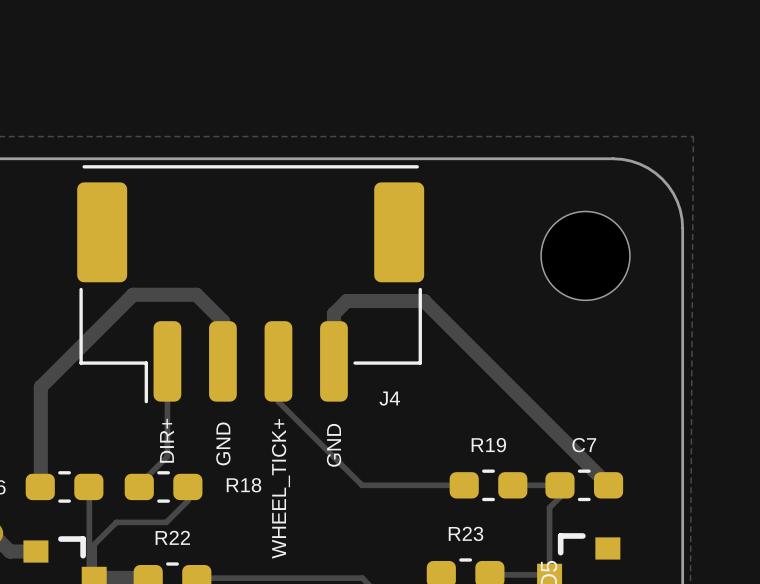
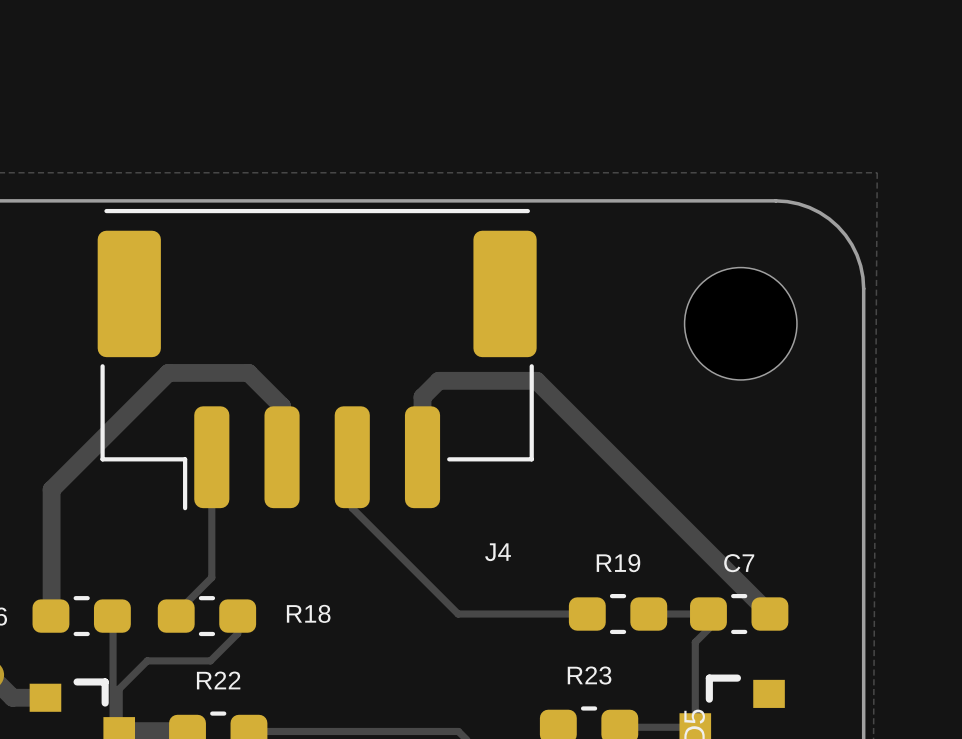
J4 name position: J4 (389, 398) -> J4 (498, 552)
text: DIR+ (166, 440) -> none
text: GND (223, 443) -> none
text: GND (334, 445) -> none
text: WHEEL_TICK+ (280, 488) -> none

